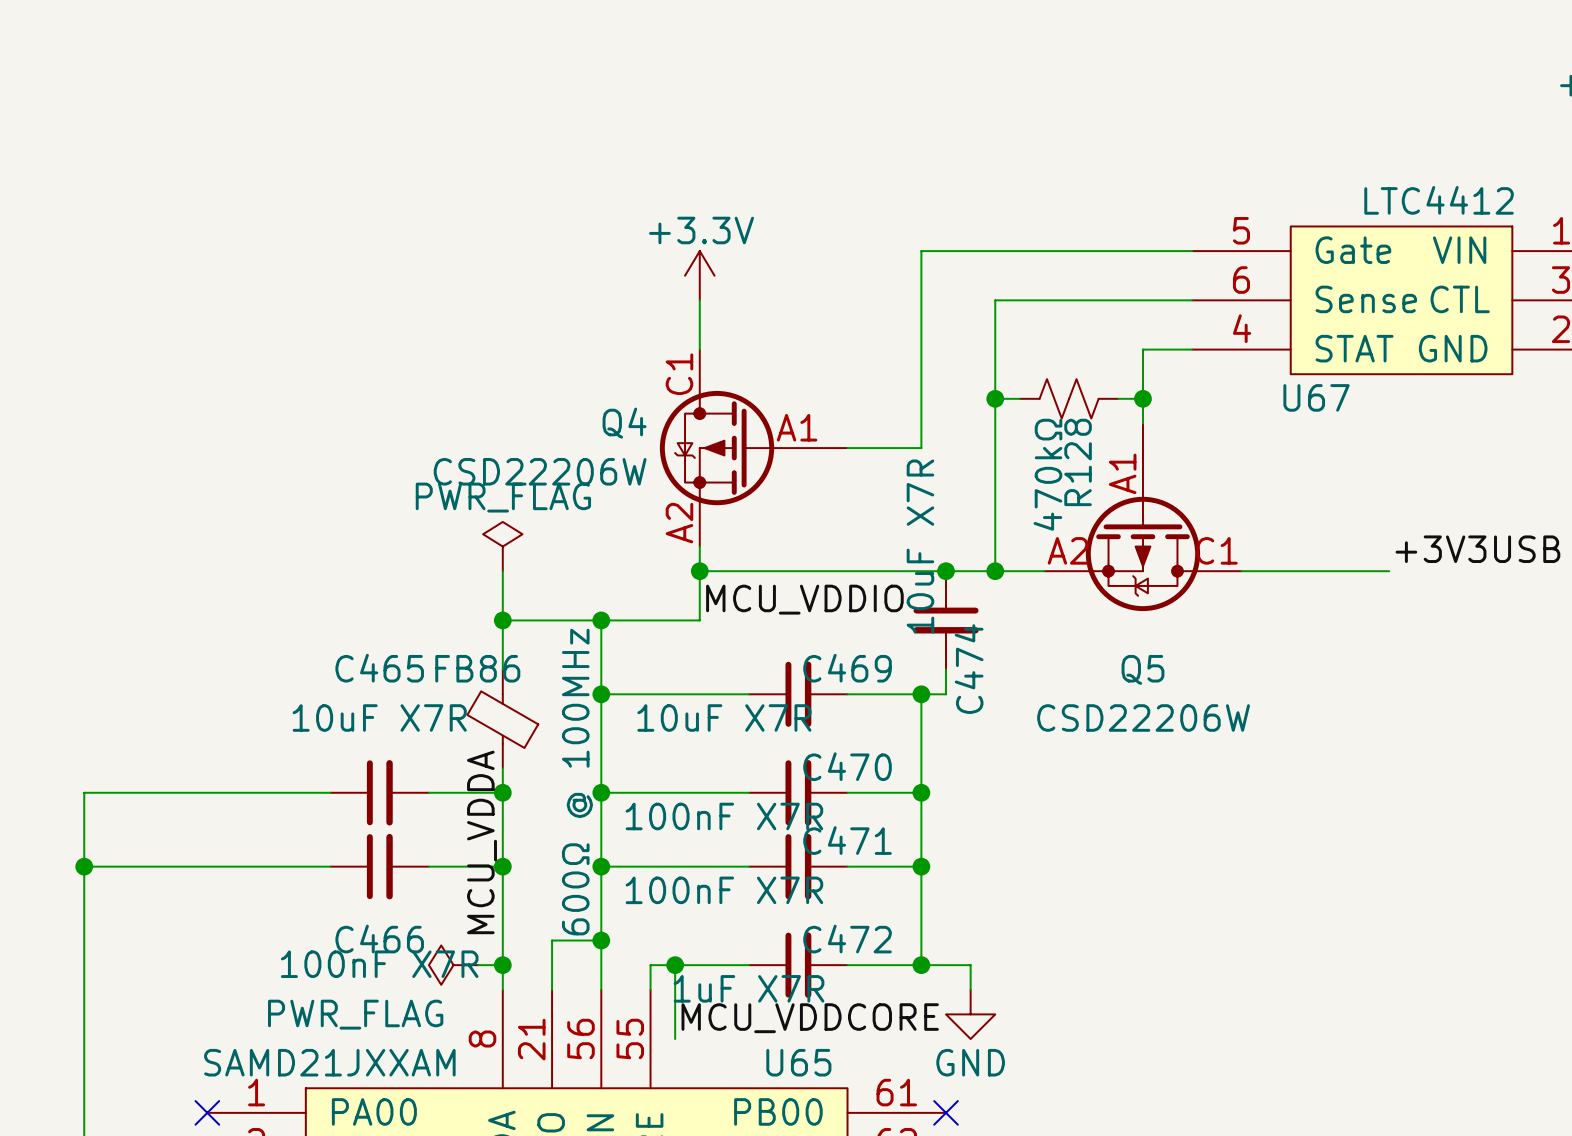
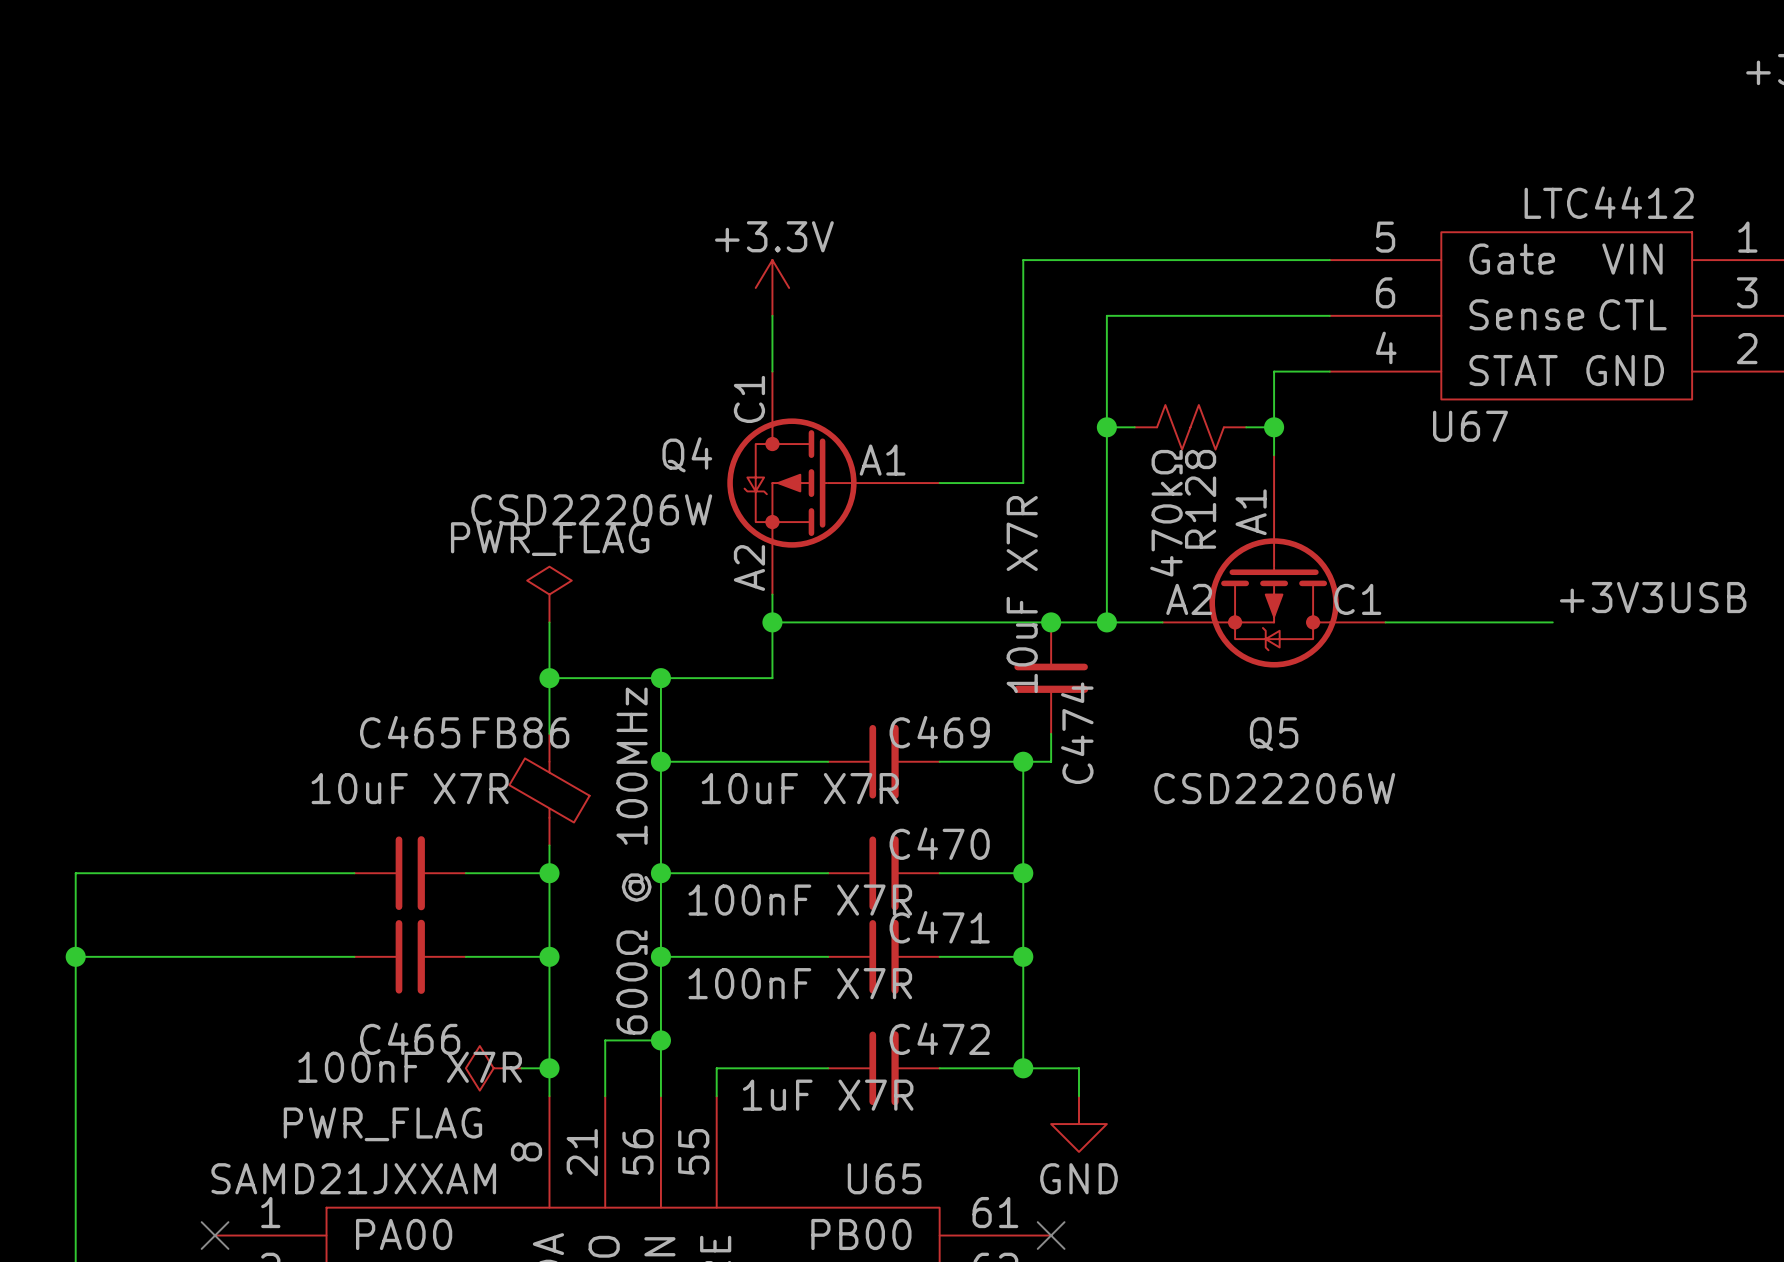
label: MCU_VDDIO (804, 599) -> none
label: MCU_VDDA (482, 842) -> none
wire: (675, 965) (675, 1039) -> none
junction: (675, 965) -> none
label: MCU_VDDCORE (810, 1018) -> none

